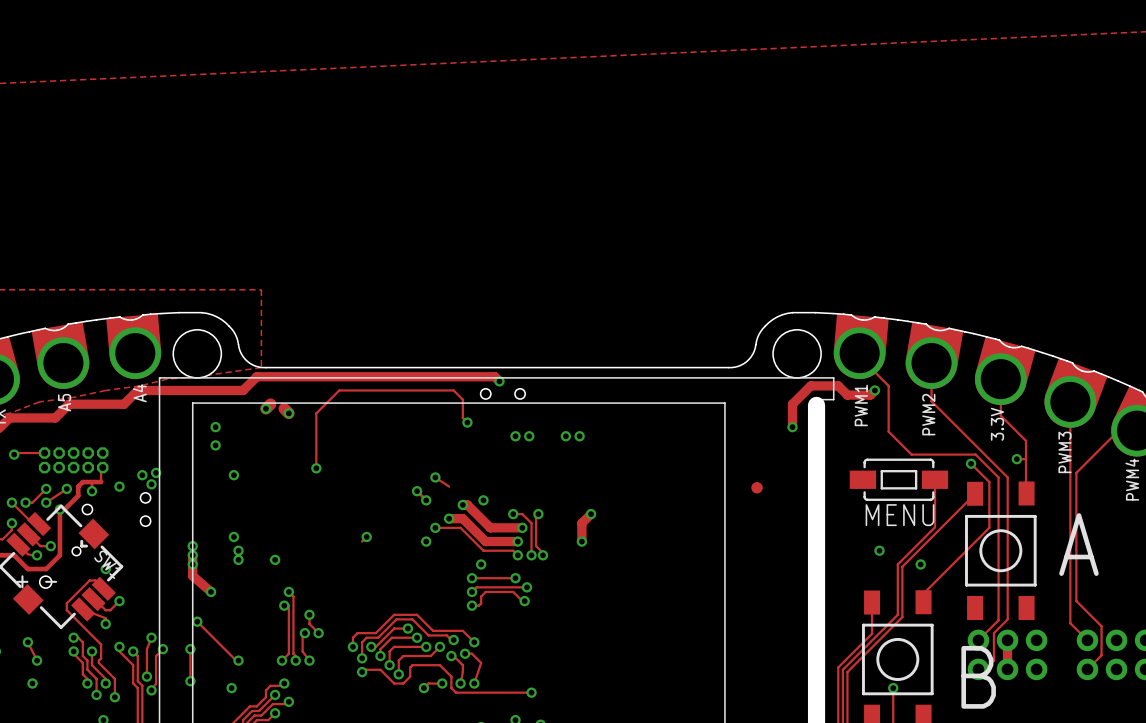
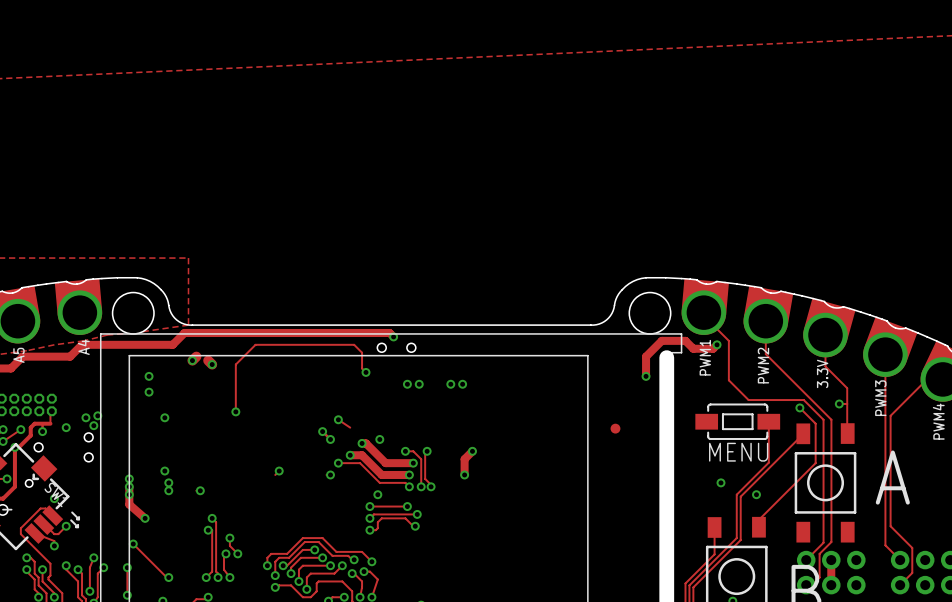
line: none -> (72, 512) (79, 519)
line: none -> (79, 519) (77, 519) (79, 517) (79, 519)
line: none -> (71, 520) (78, 527)
line: none -> (78, 527) (76, 527) (78, 525) (78, 527)

